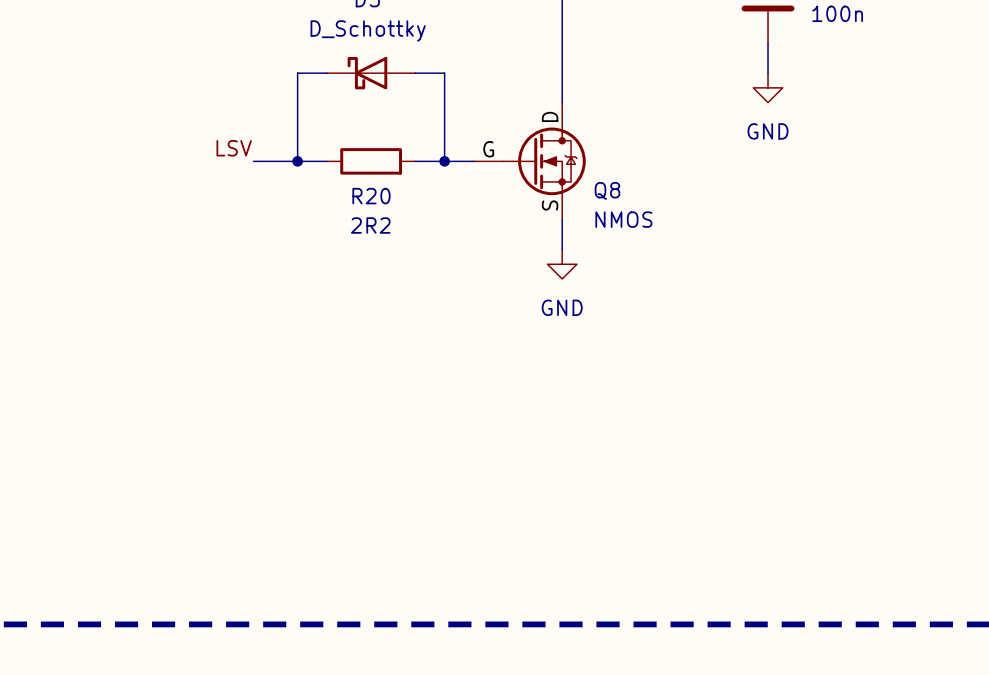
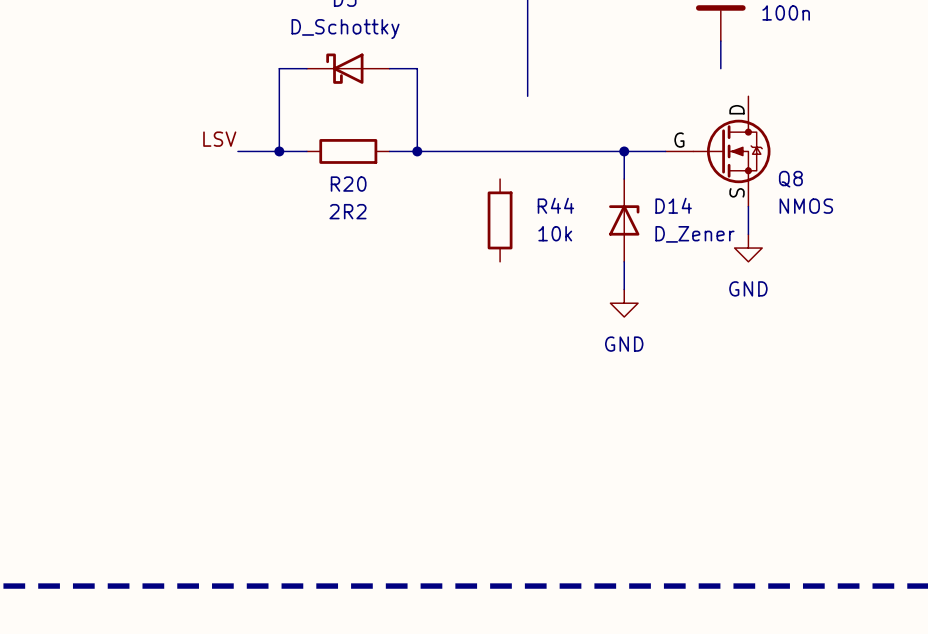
power symbol: GND (768, 87) -> none
wire: none -> (444, 151) (665, 151)
Q8 position: (529, 161) -> (718, 151)
wire: none -> (624, 151) (624, 179)
junction: none -> (624, 151)
wire: (562, 220) (562, 249) -> (624, 261) (624, 289)
wire: none -> (748, 206) (748, 234)
R44: none -> 10k (500, 220)
D14: none -> D_Zener (624, 220)
power symbol: GND (562, 264) -> none
power symbol: none -> GND (748, 248)
power symbol: none -> GND (624, 303)

